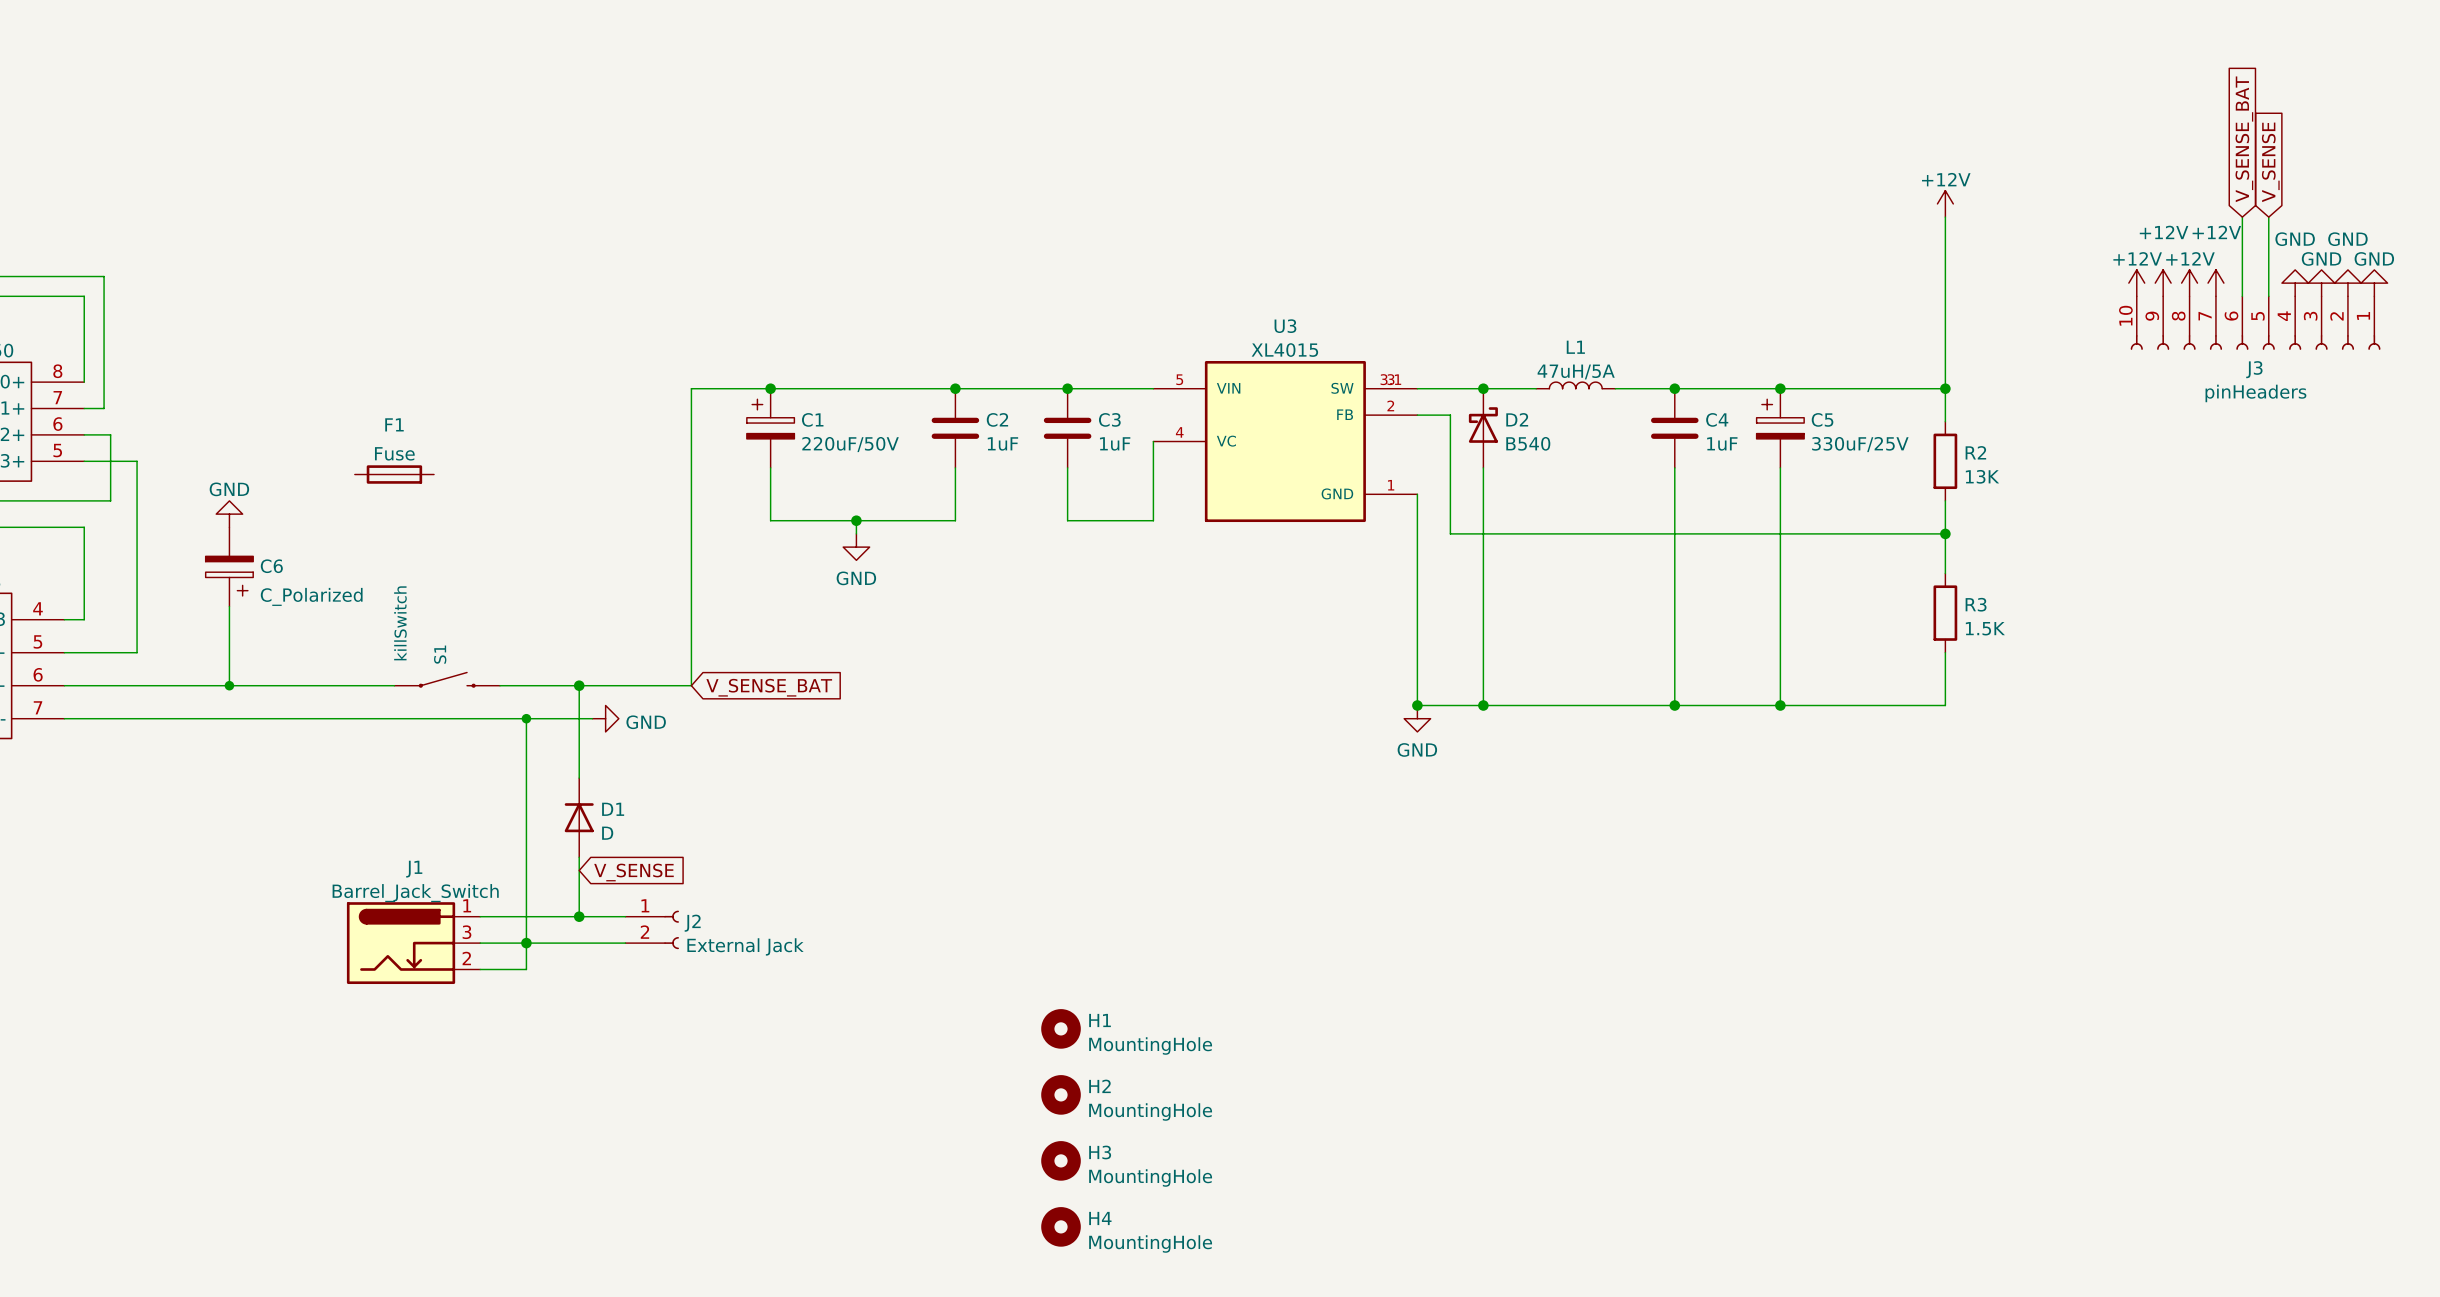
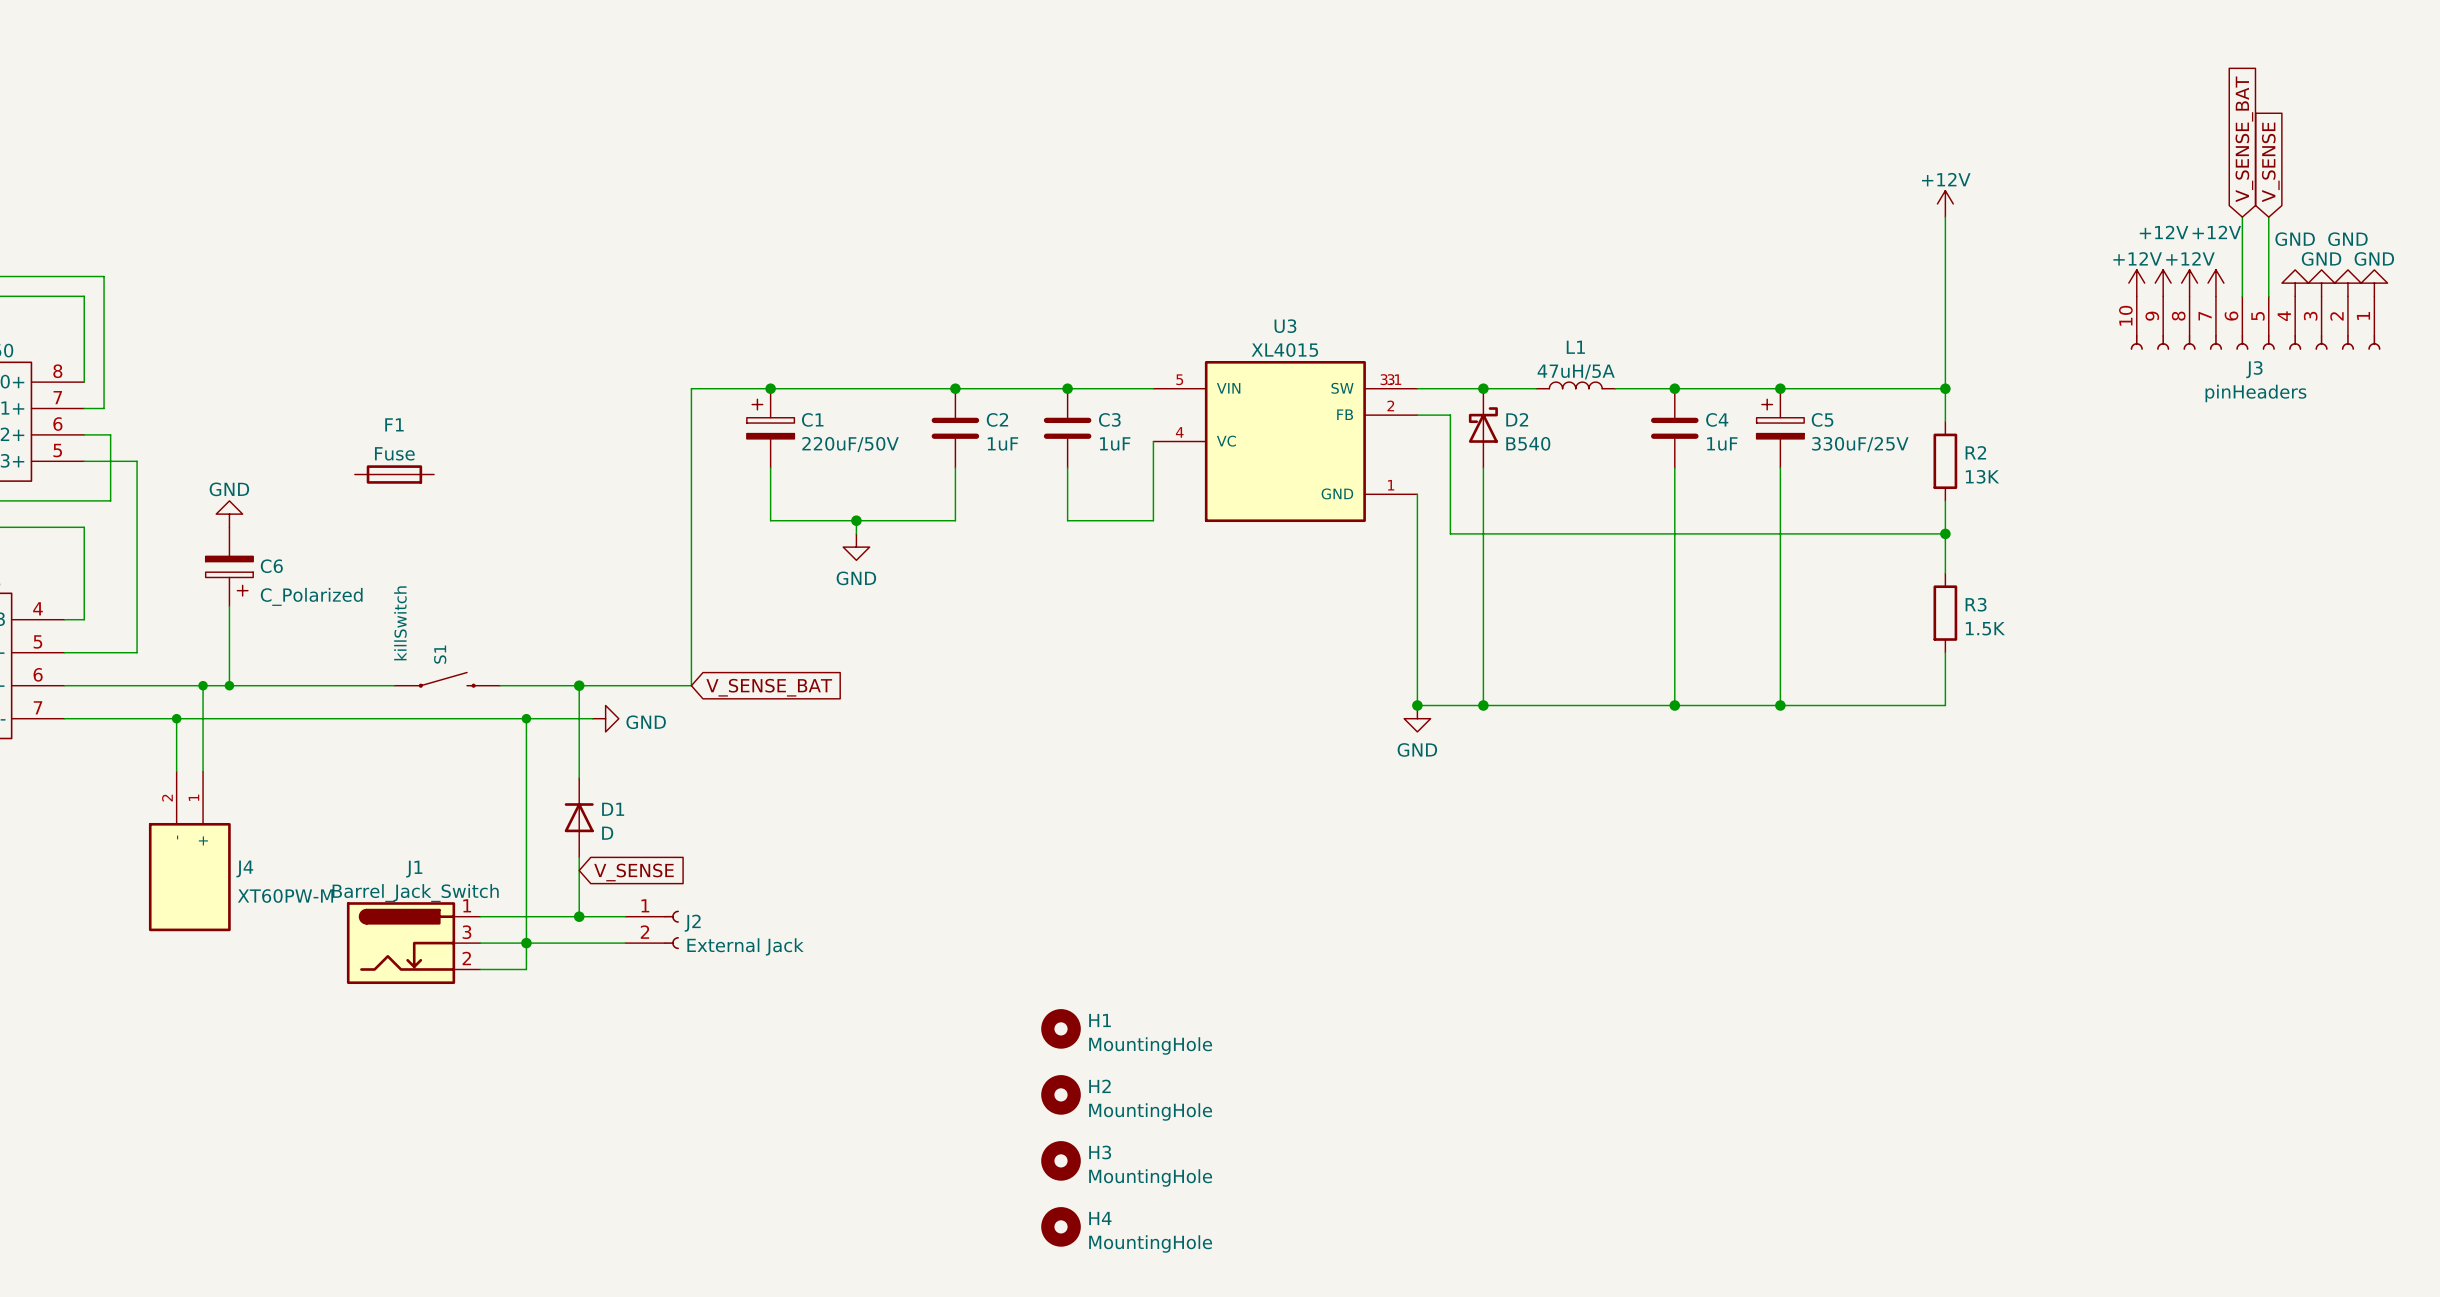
wire: none -> (203, 685) (203, 771)
junction: none -> (203, 685)
wire: none -> (176, 718) (176, 771)
junction: none -> (176, 718)
J4: none -> XT60PW-M (189, 851)

